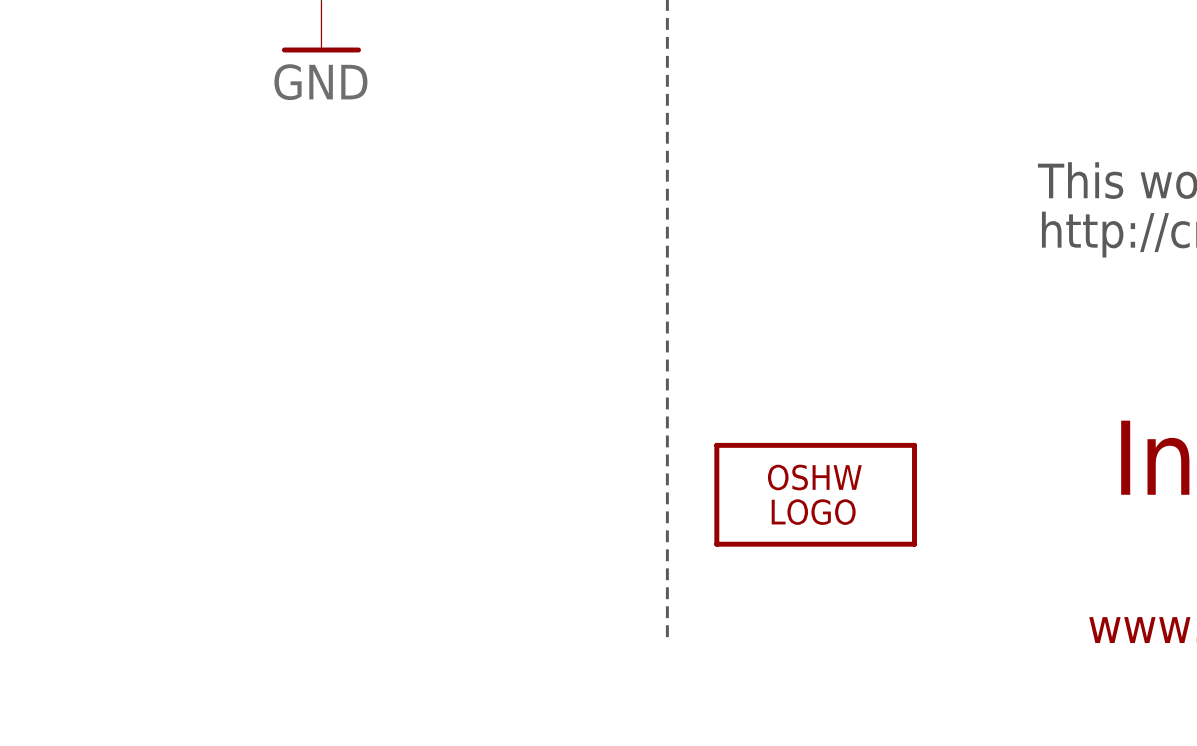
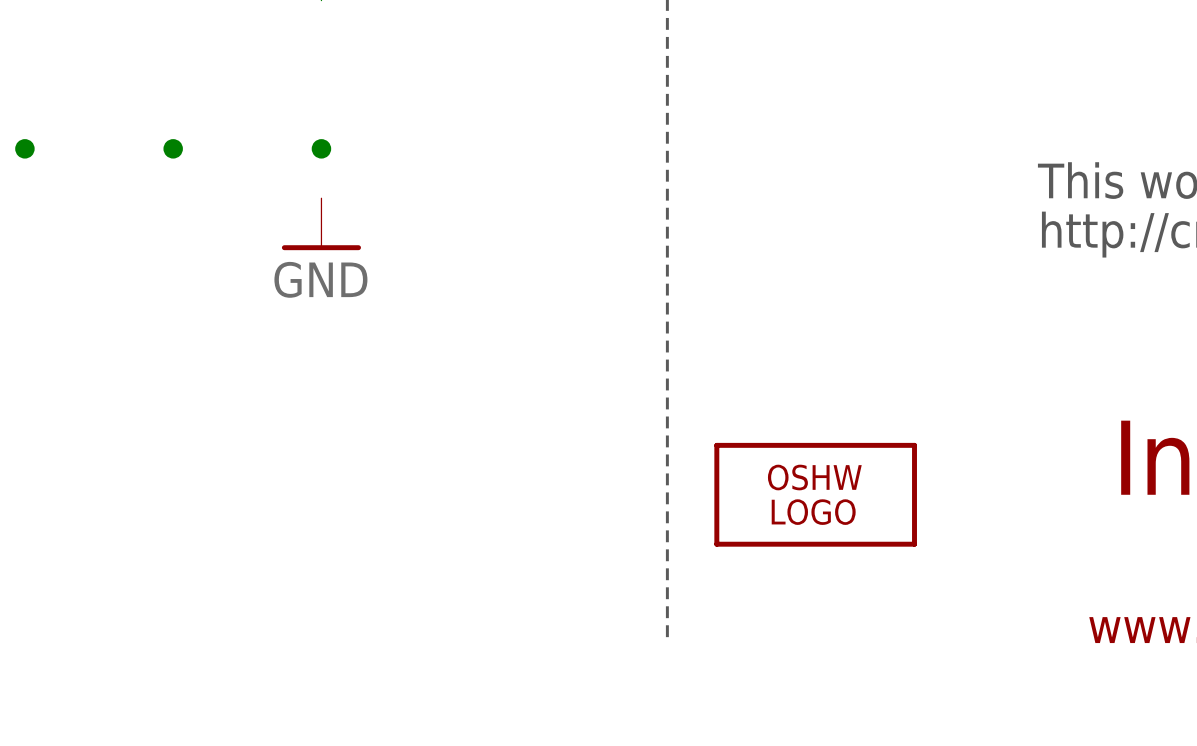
power symbol position: GND (321, 26) -> GND (321, 224)
junction: none -> (24, 148)
junction: none -> (173, 148)
junction: none -> (321, 148)

